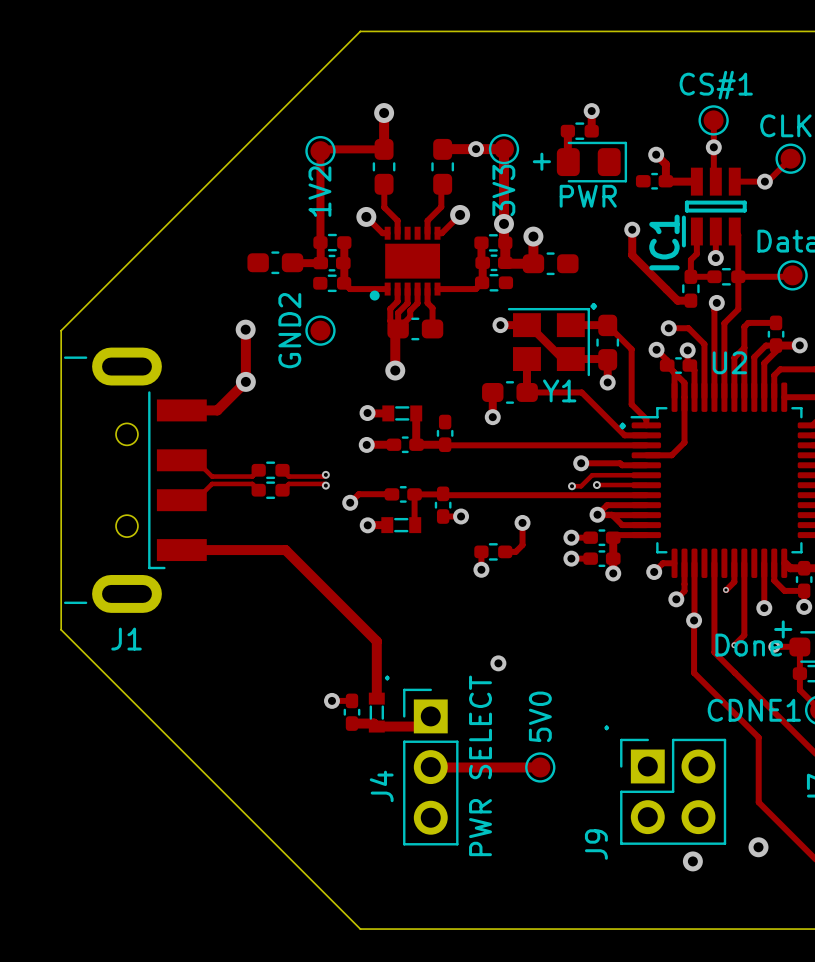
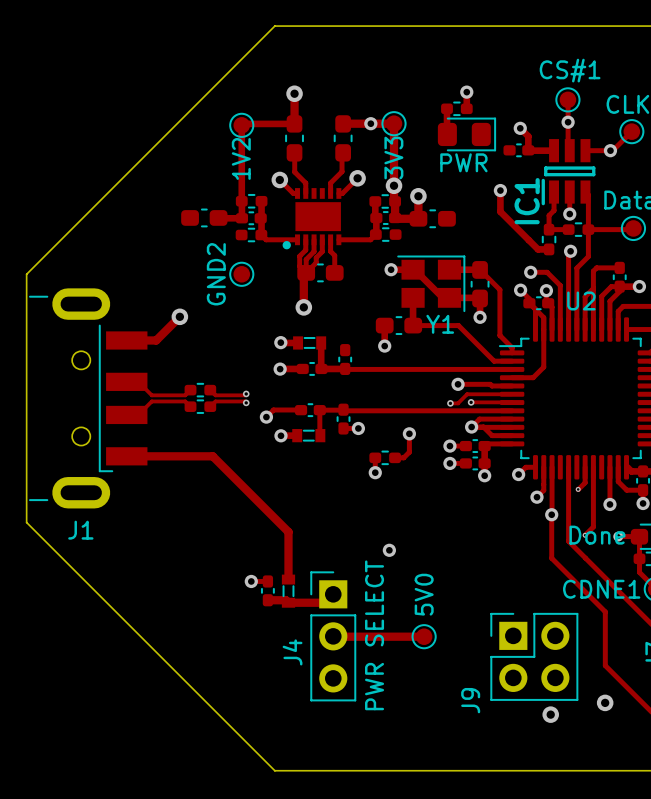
text: + (541, 161) -> none
text: . (593, 306) -> none
track: (245, 329) (245, 381) -> none
via: (245, 329) -> none
text: . (622, 425) -> none
text: + (783, 629) -> none
text: . (387, 678) -> none
text: . (606, 727) -> none

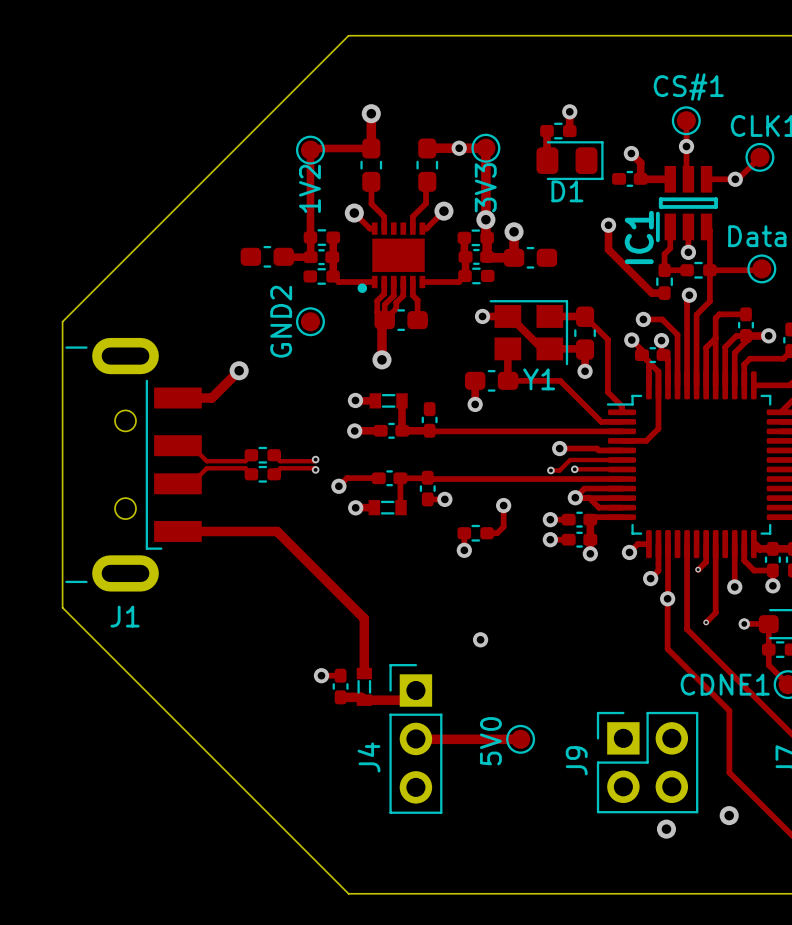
D1 name: none -> D1 (567, 191)
D1 value: PWR (463, 162) -> none
U2 name: U2 (581, 300) -> none
part value: Done (597, 535) -> none
5V0 name position: 5V0 (424, 594) -> 5V0 (490, 741)
text: PWR SELECT (374, 635) -> none
J9 name position: J9 (470, 700) -> J9 (576, 760)

